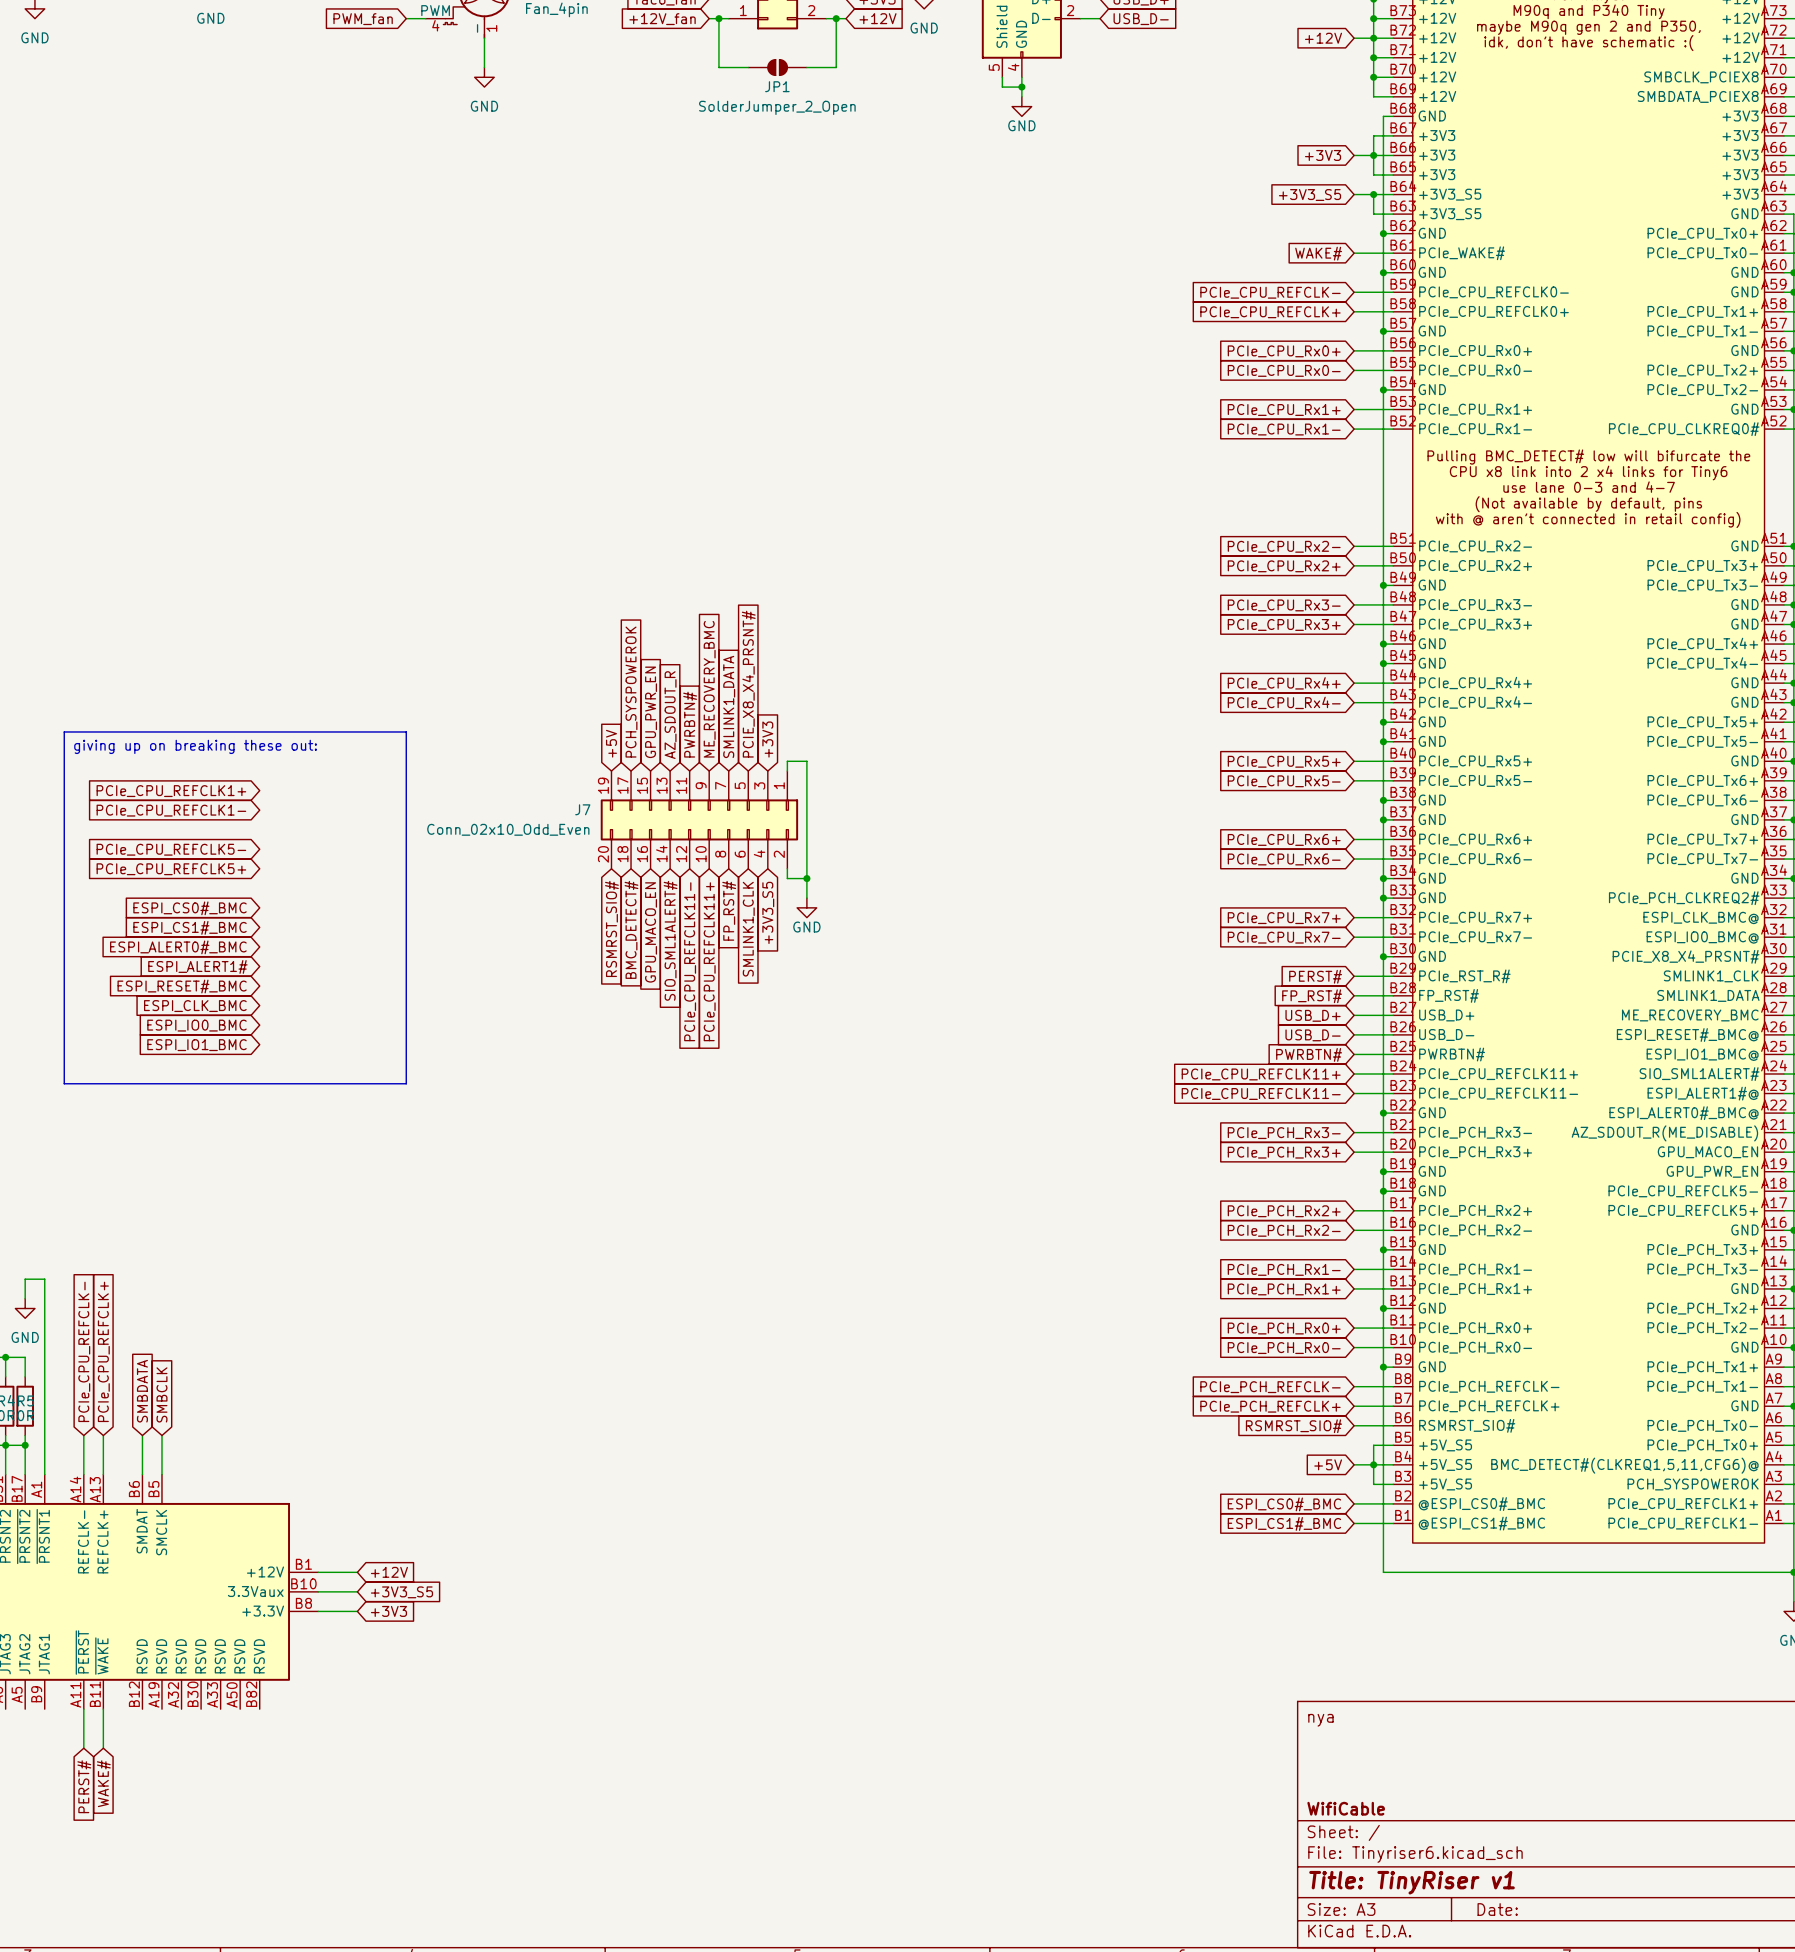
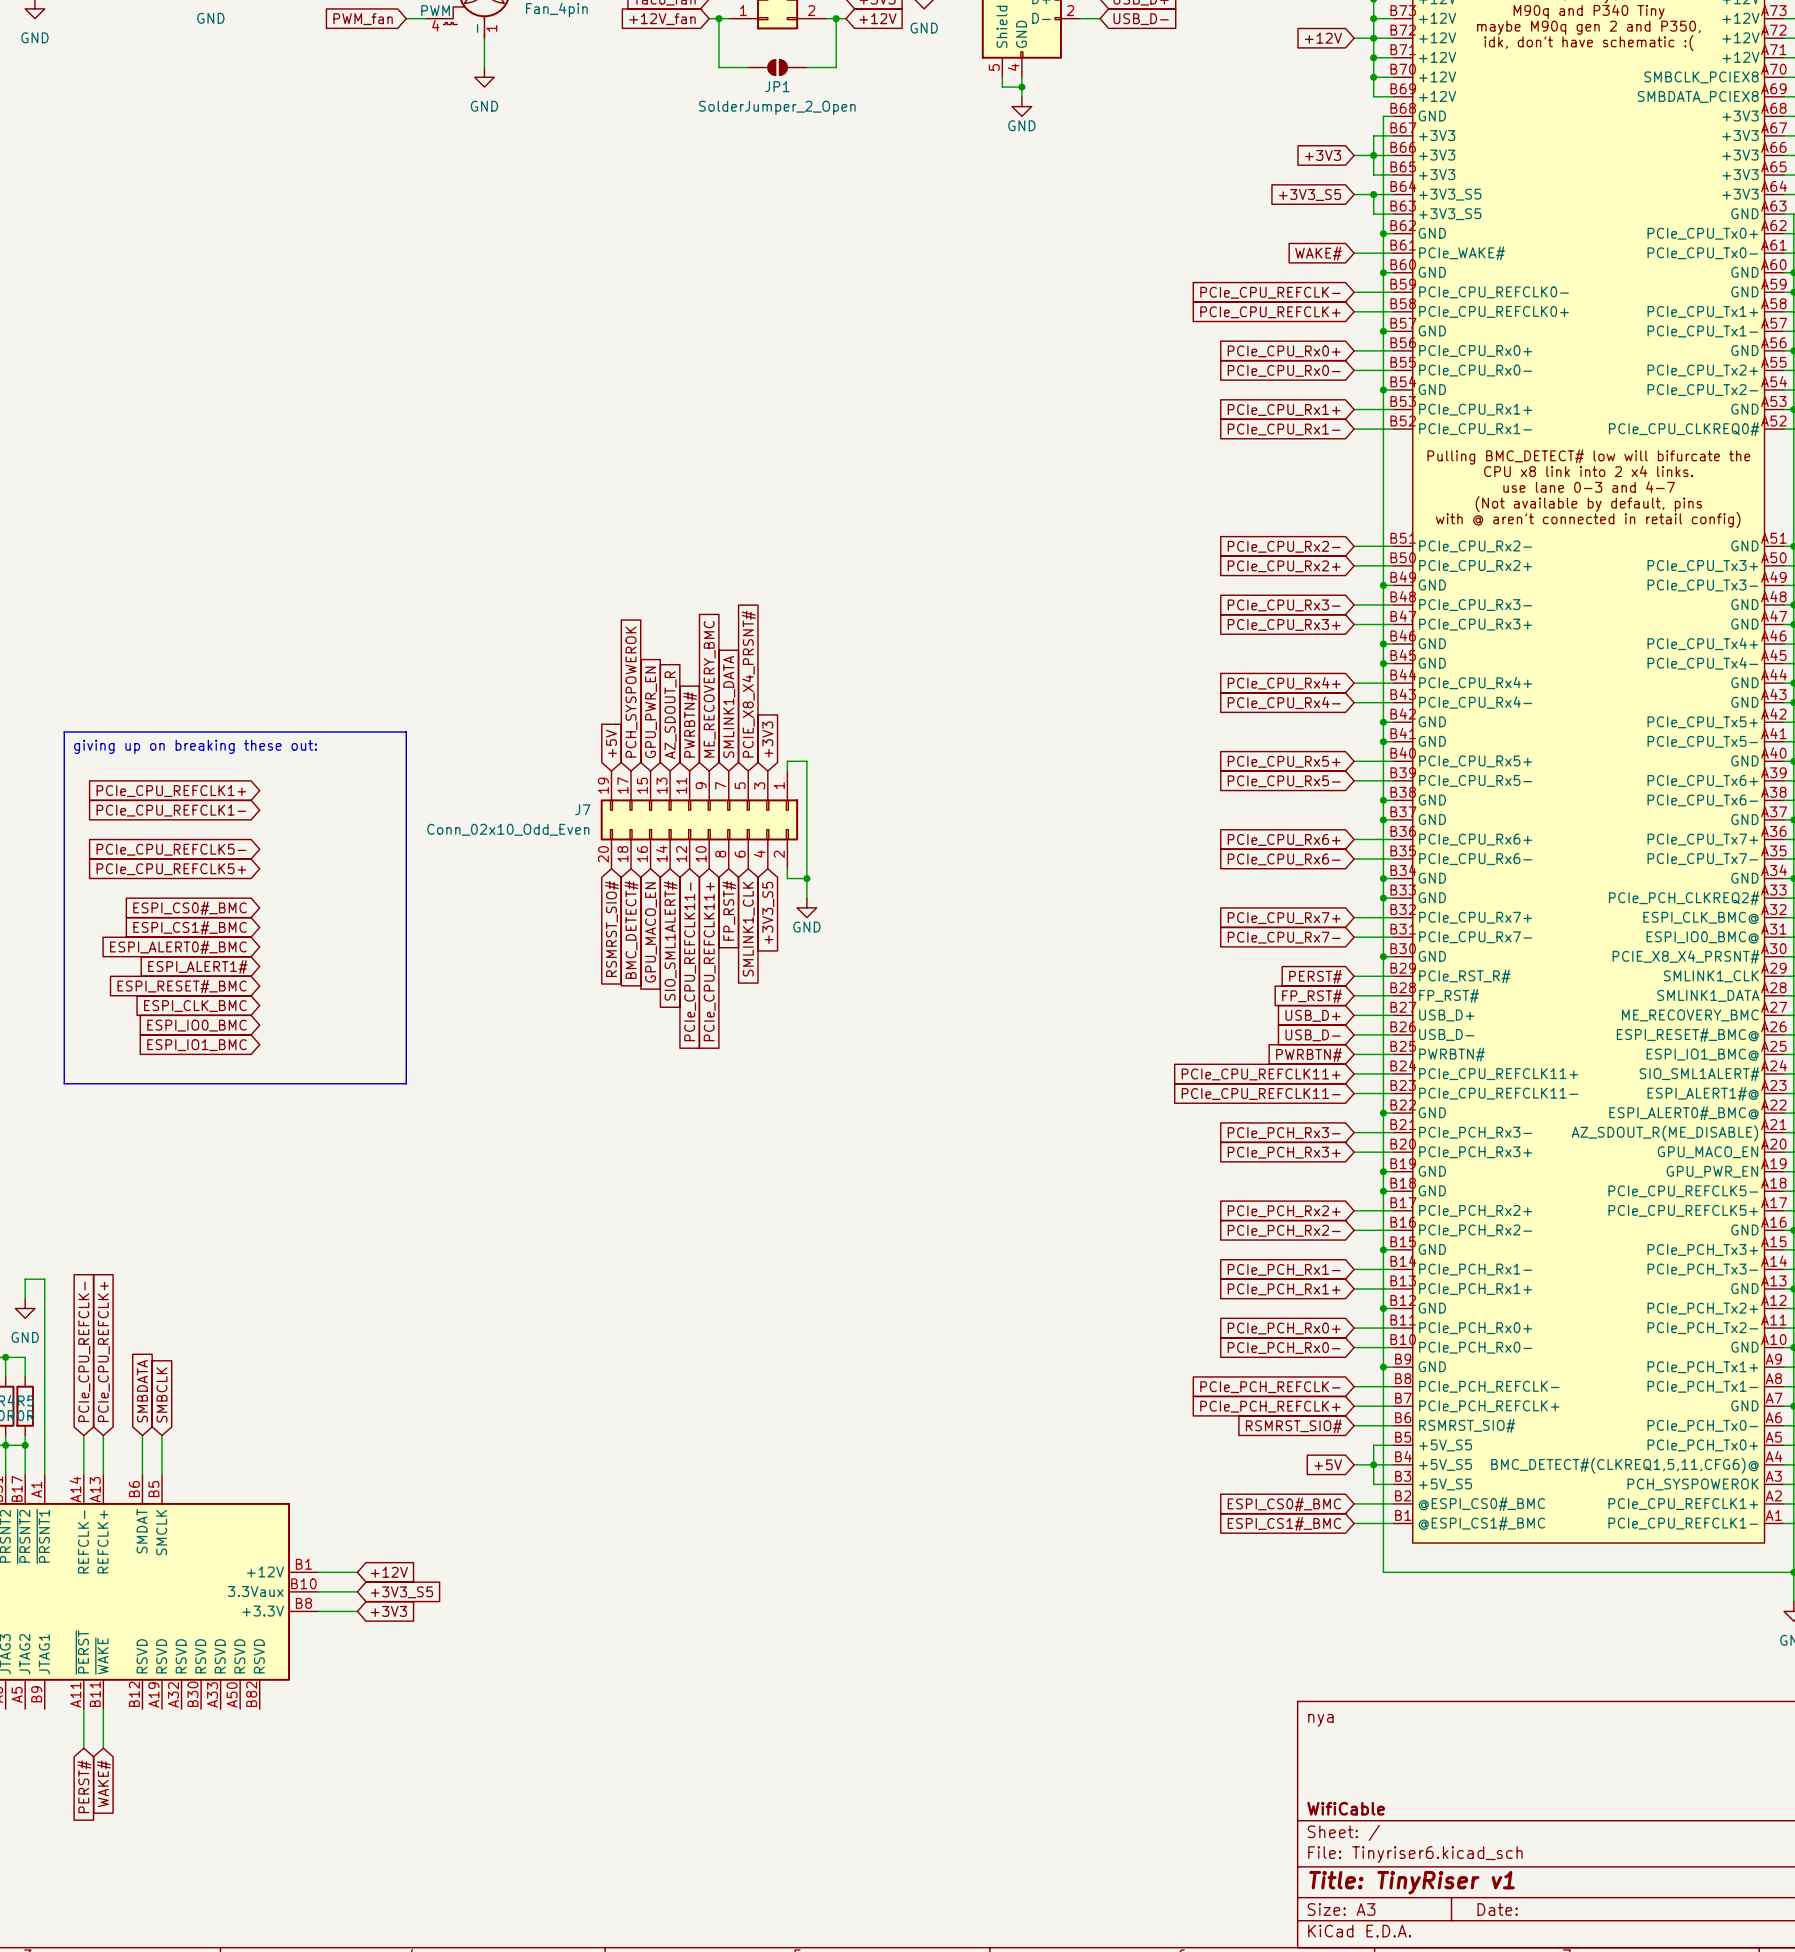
part text: CPU x8 link into 2 x4 links for Tiny6 (1588, 472) -> CPU x8 link into 2 x4 links. (1588, 471)

